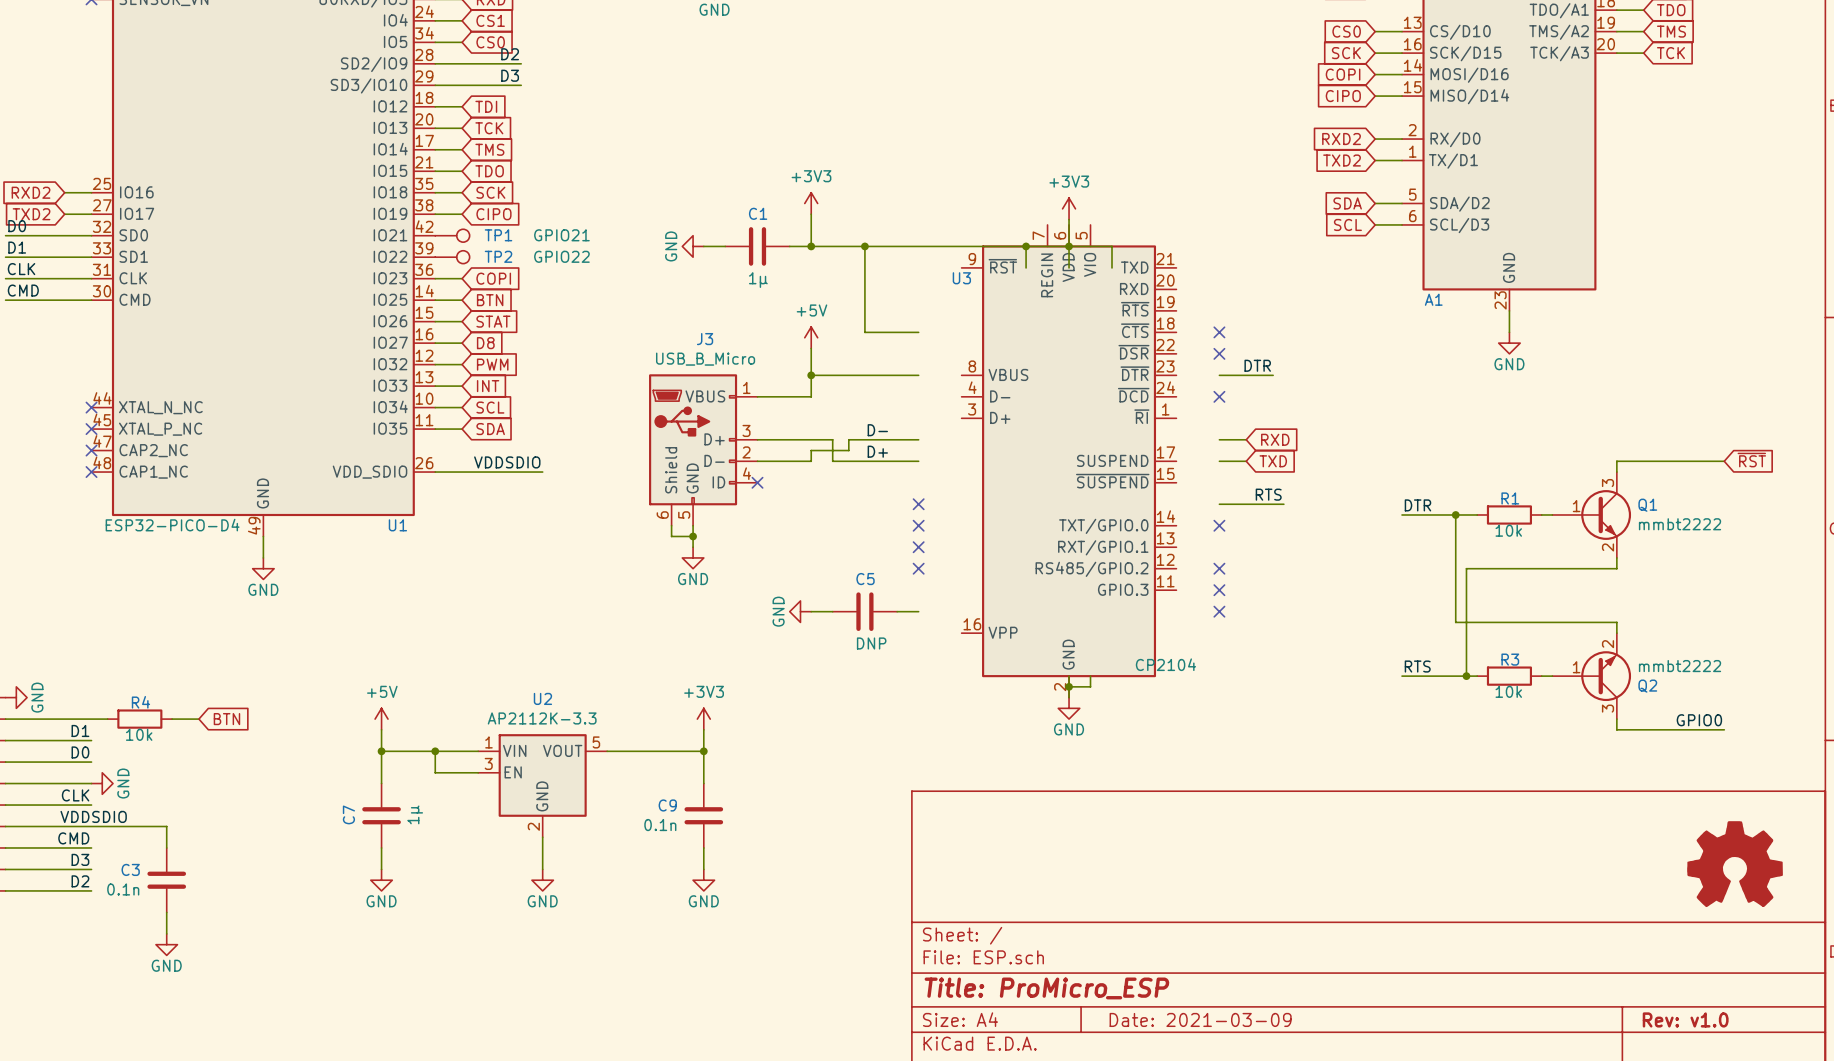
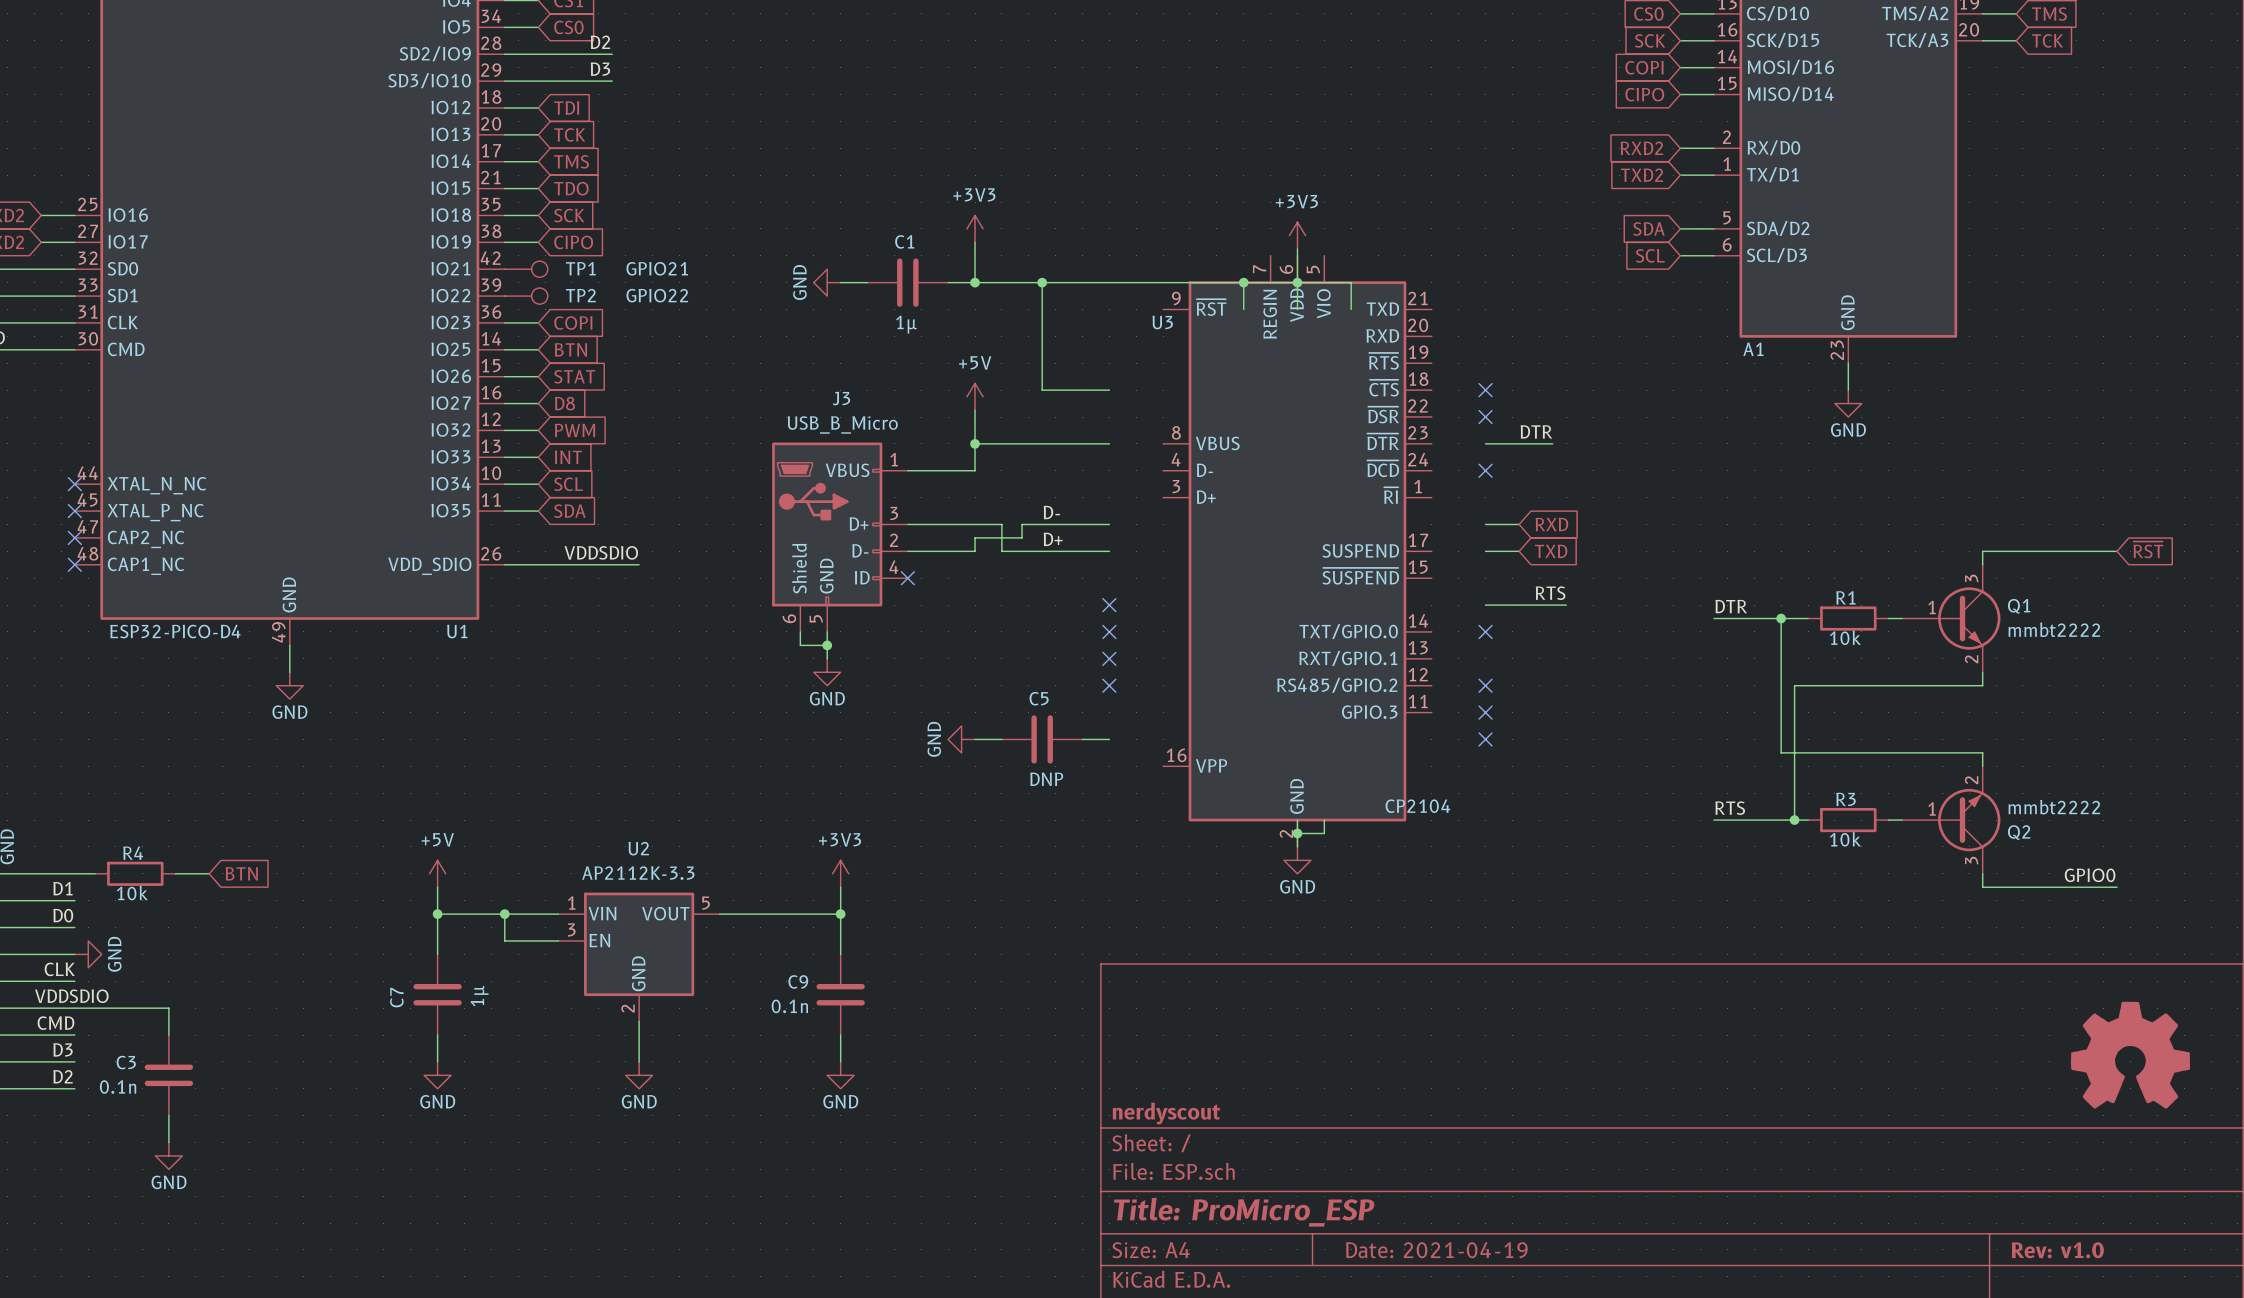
title block: none -> nerdyscout (1166, 1113)
title block: Date: 2021-03-09 (1200, 1019) -> Date: 2021-04-19 (1436, 1250)

